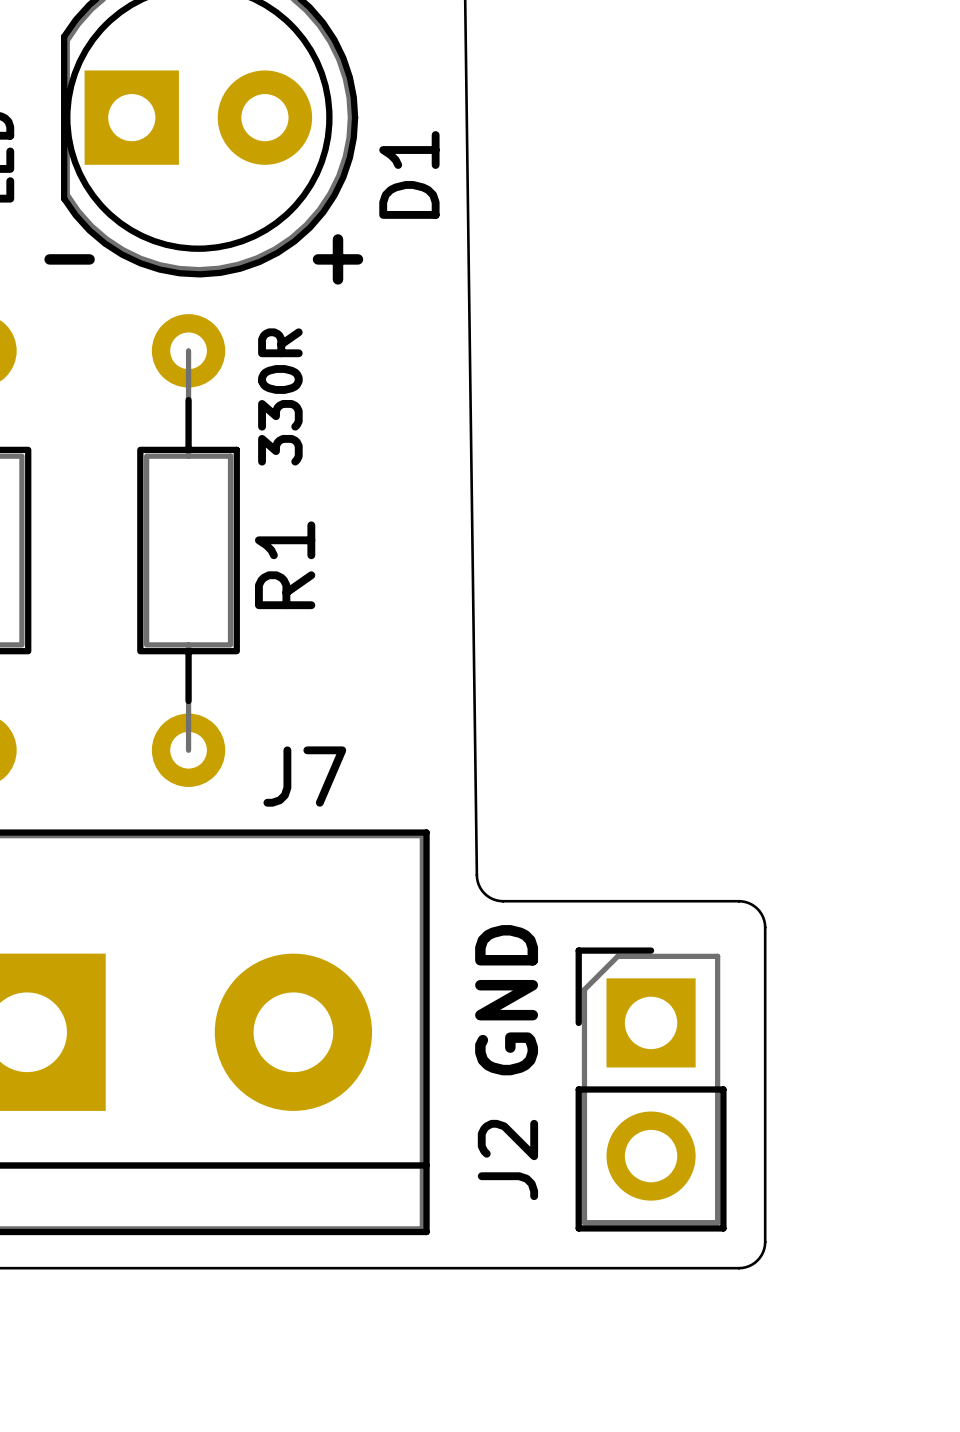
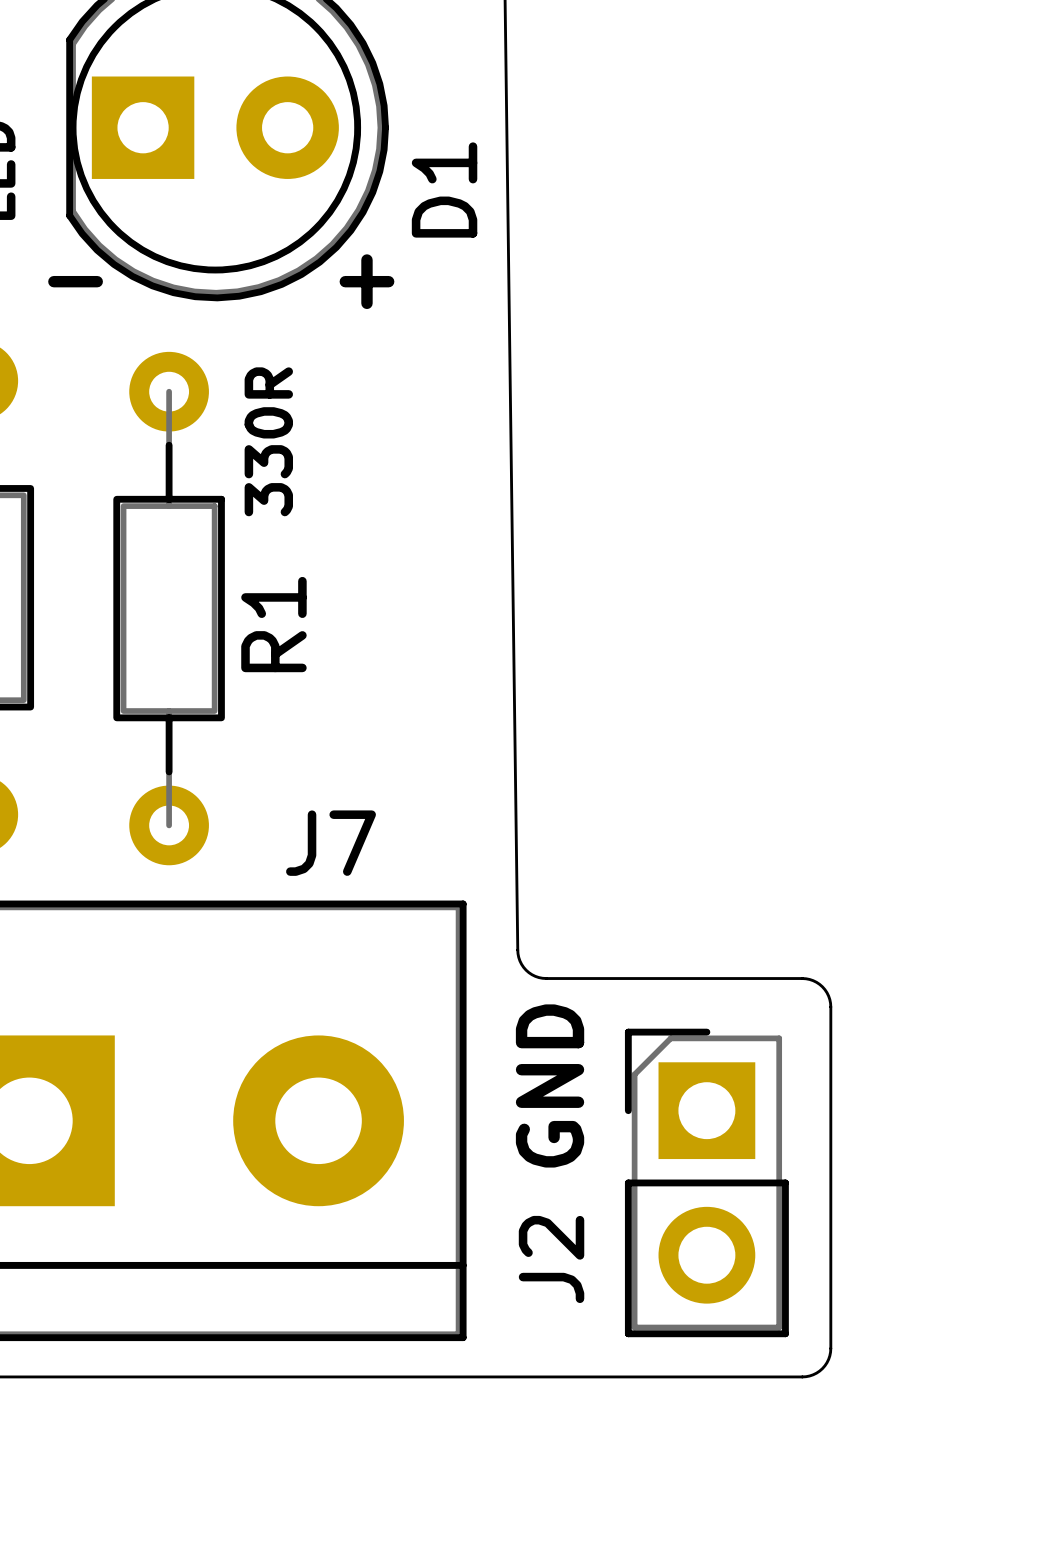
R1 position: (188, 550) -> (169, 608)

